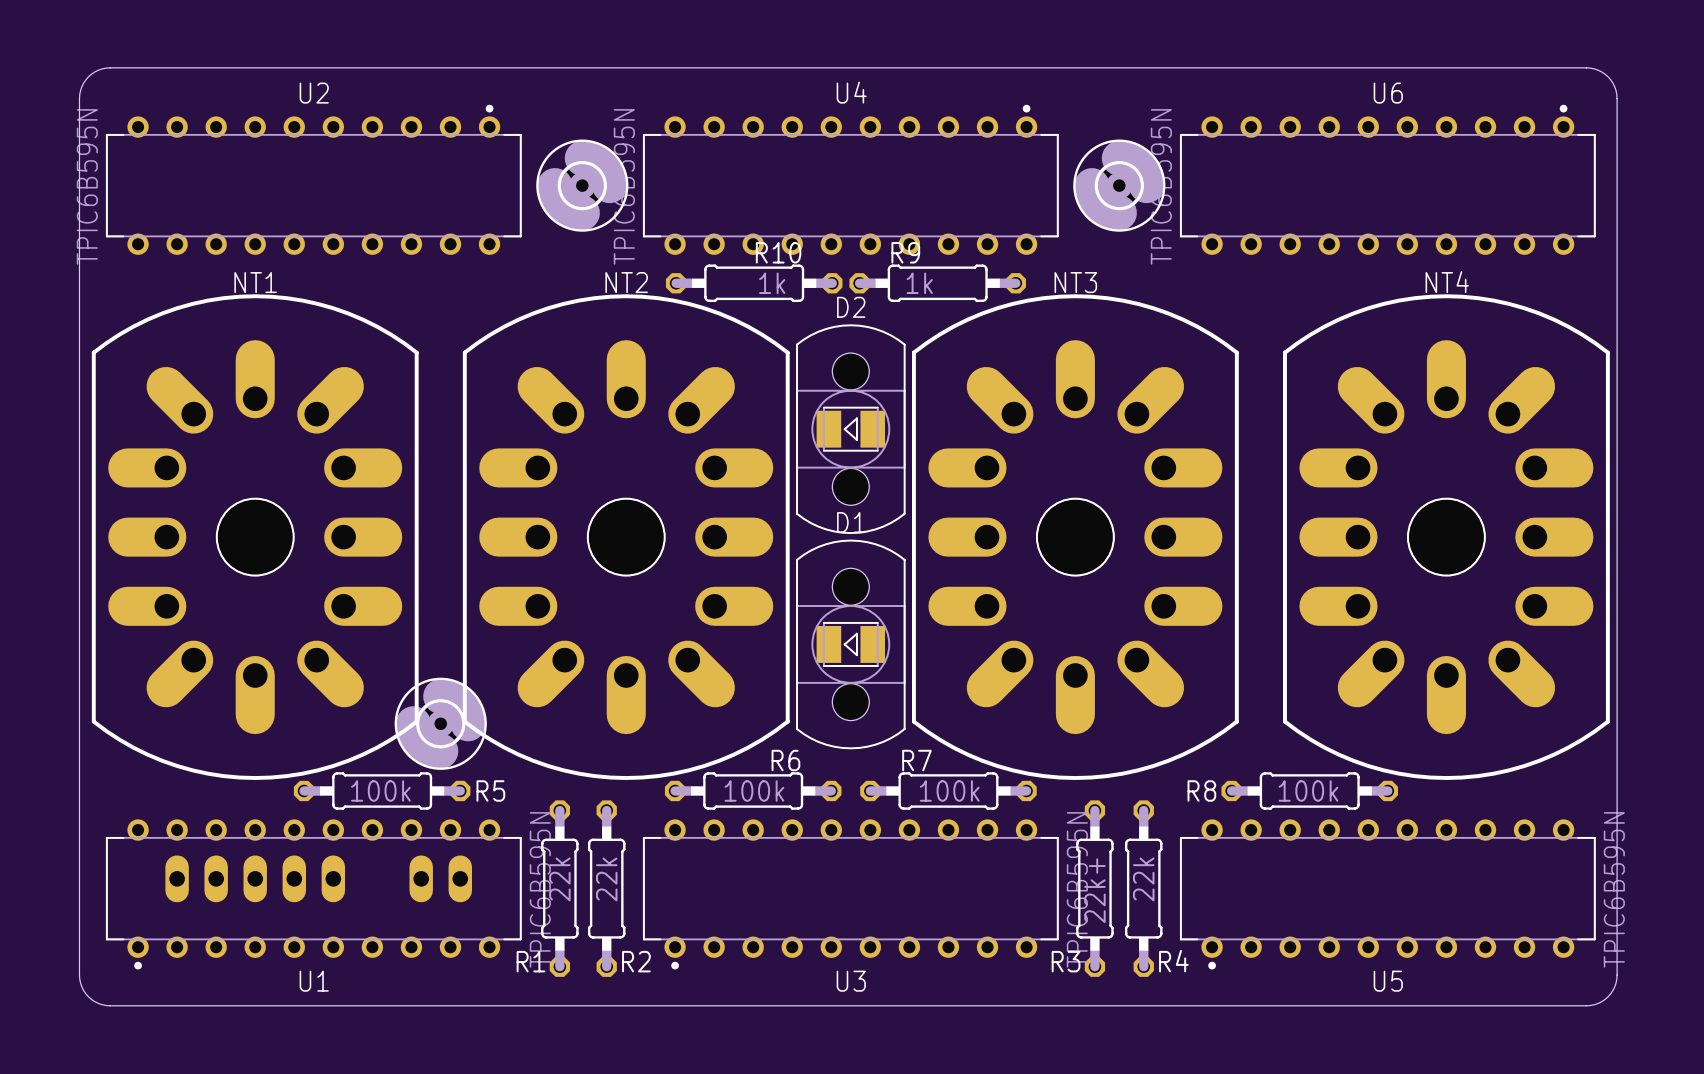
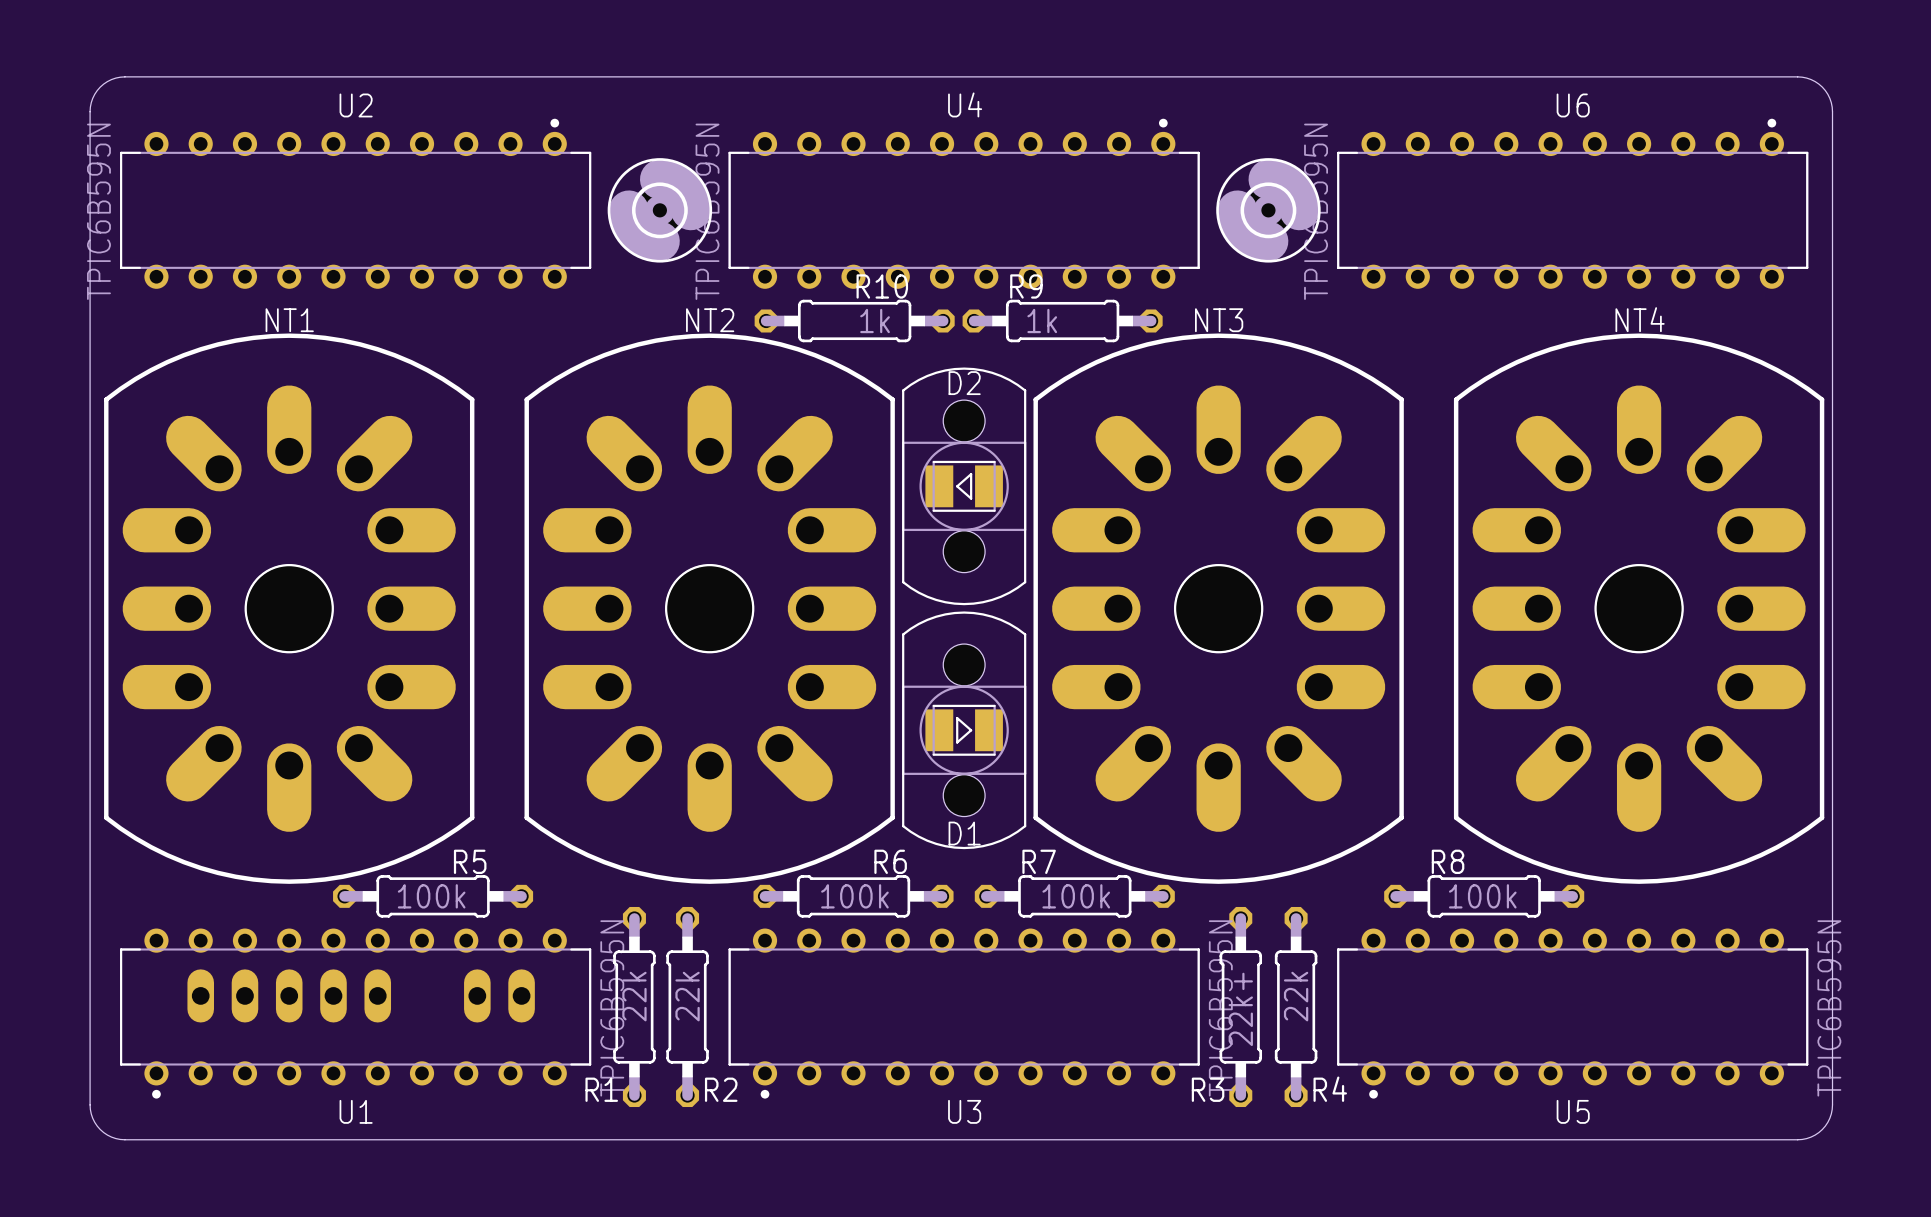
D2 name position: D2 (851, 307) -> D2 (964, 383)
D1 rotation: 0° (850, 644) -> 180° (964, 730)
part: (440, 723) -> none
R5 name position: R5 (490, 790) -> R5 (470, 861)
R8 name position: R8 (1201, 790) -> R8 (1448, 861)

